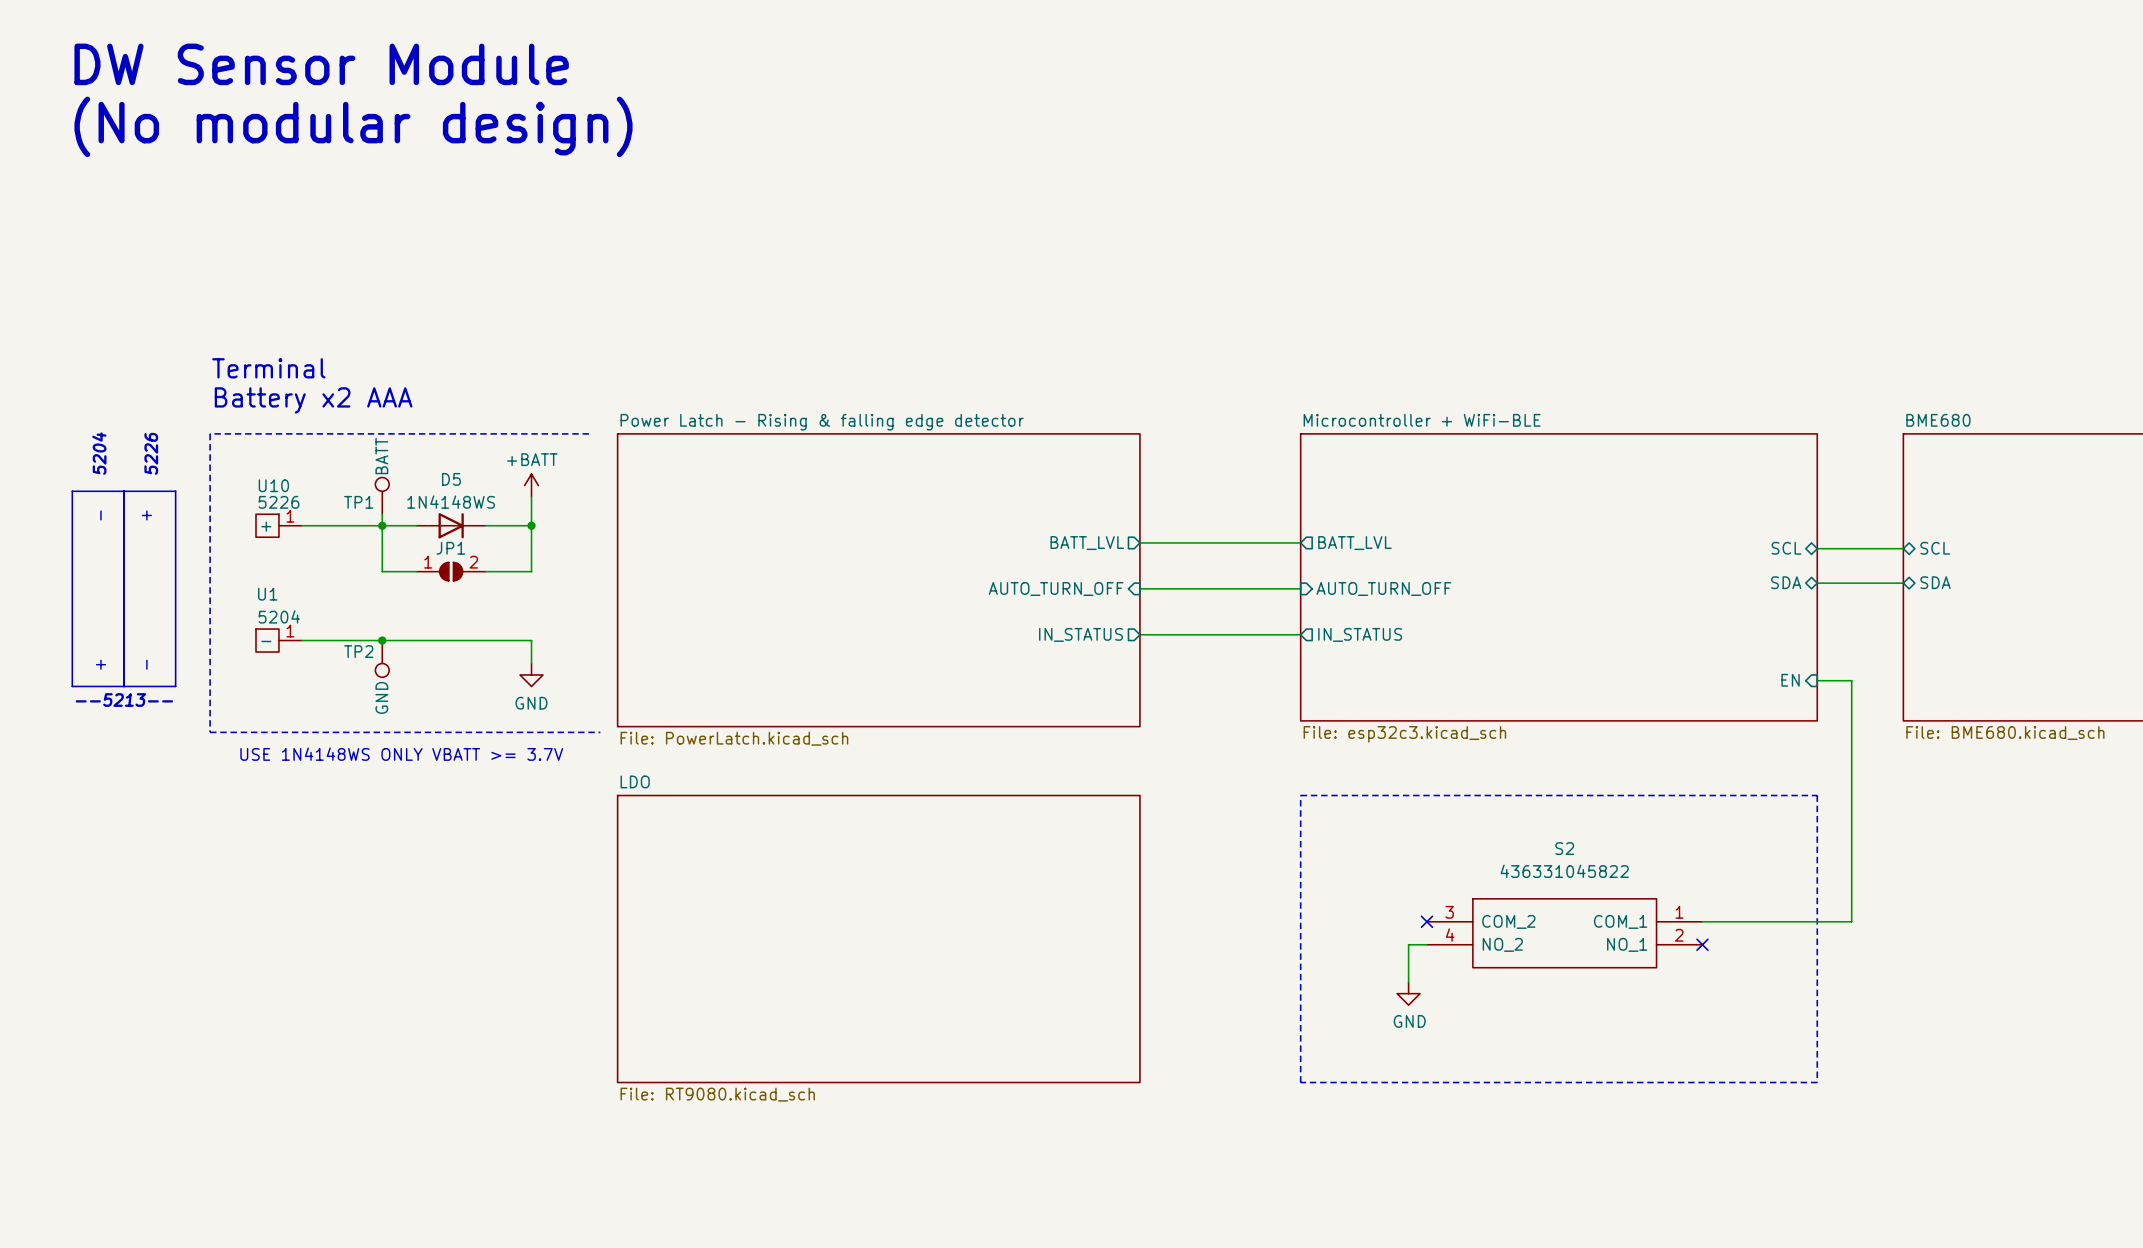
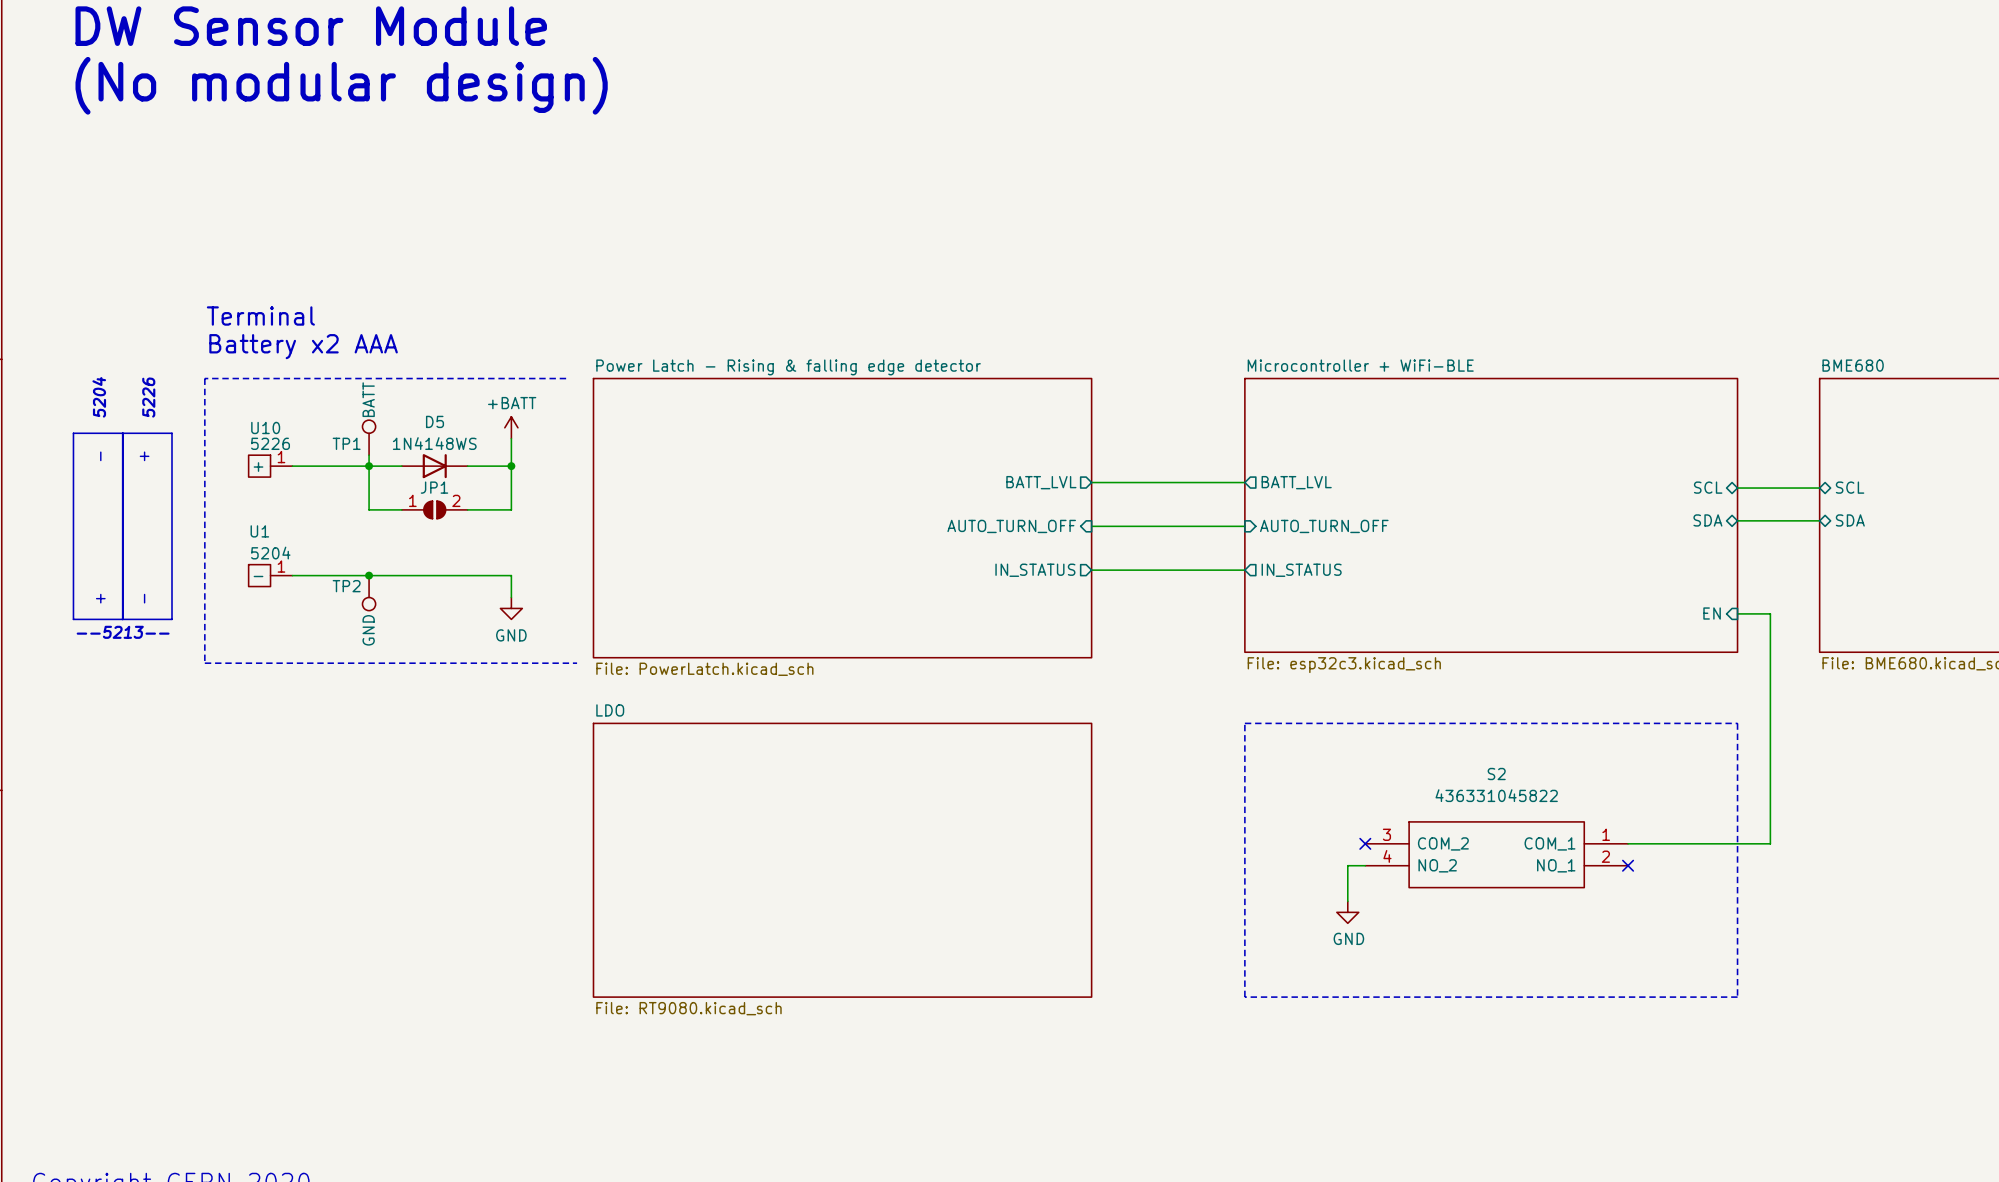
text: USE 1N4148WS ONLY VBATT >= 3.7V (401, 754) -> none

